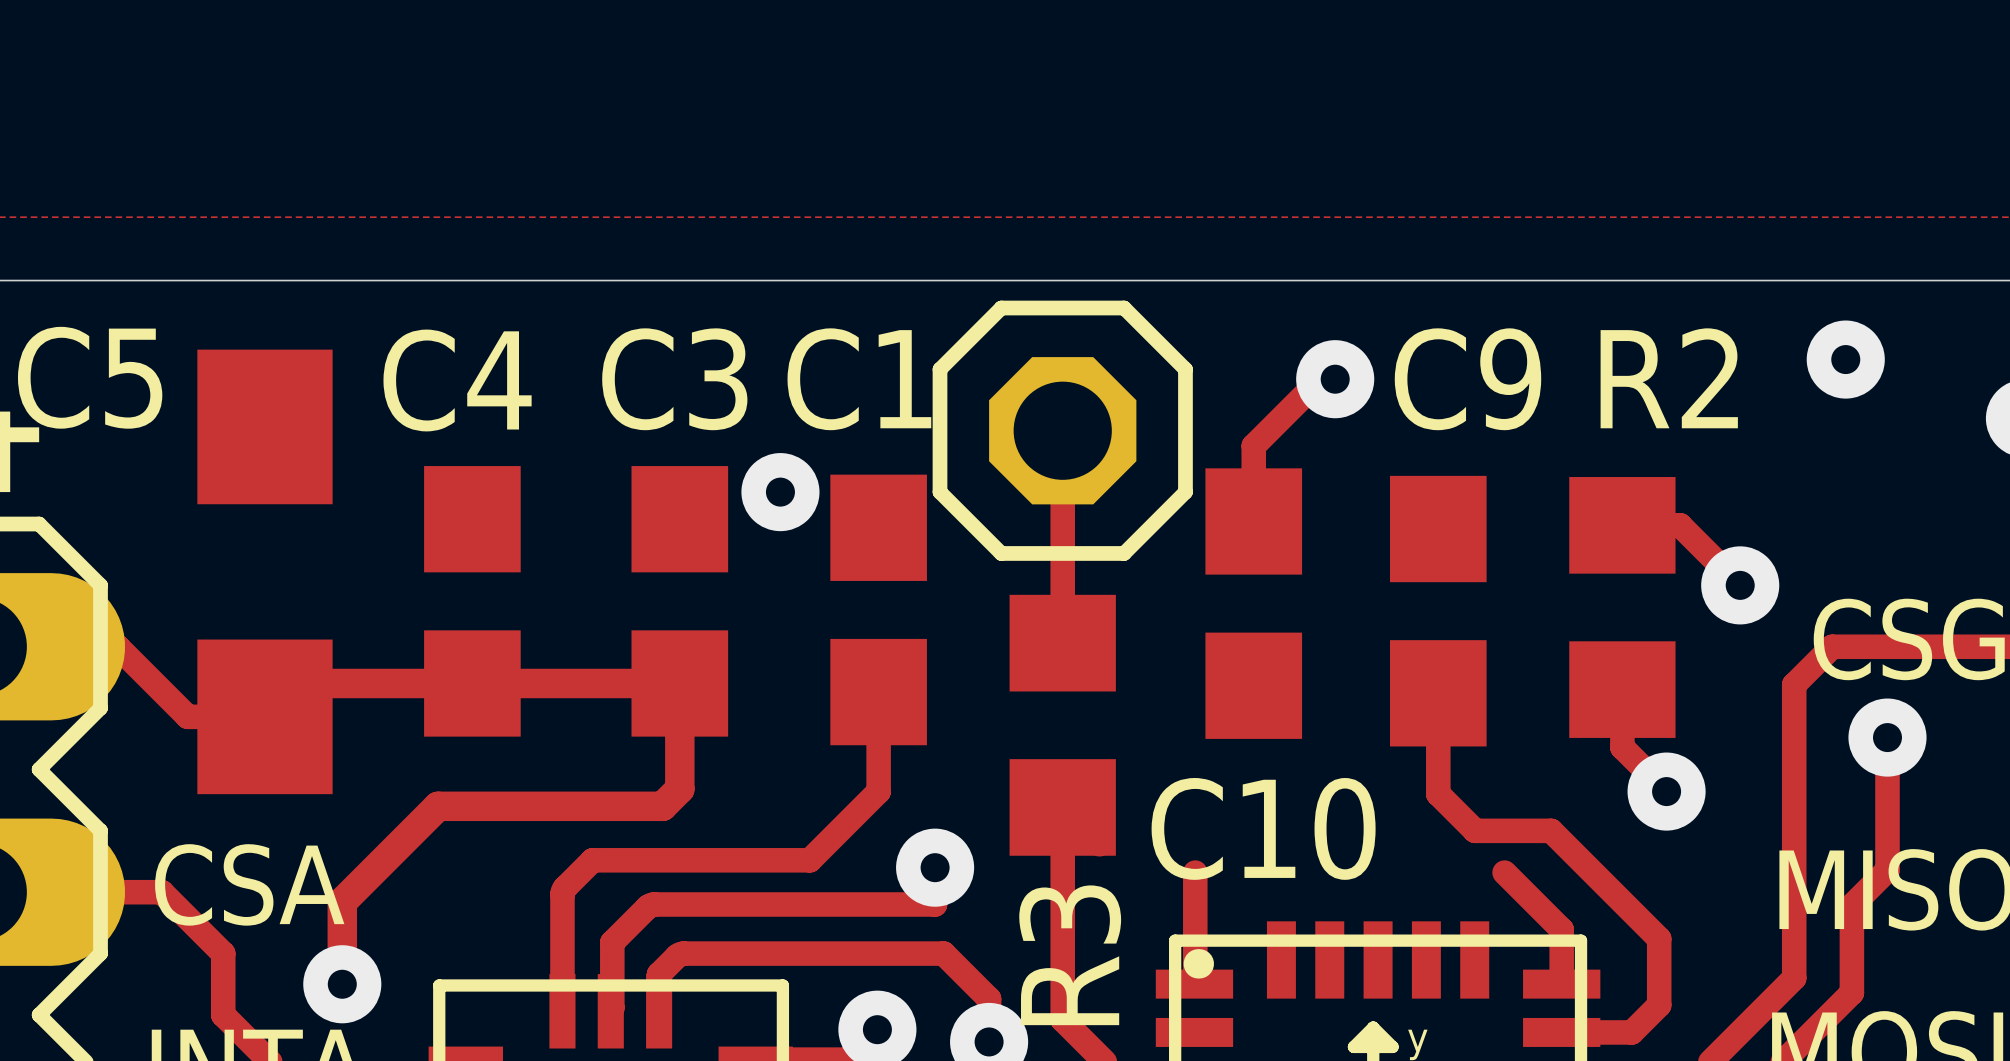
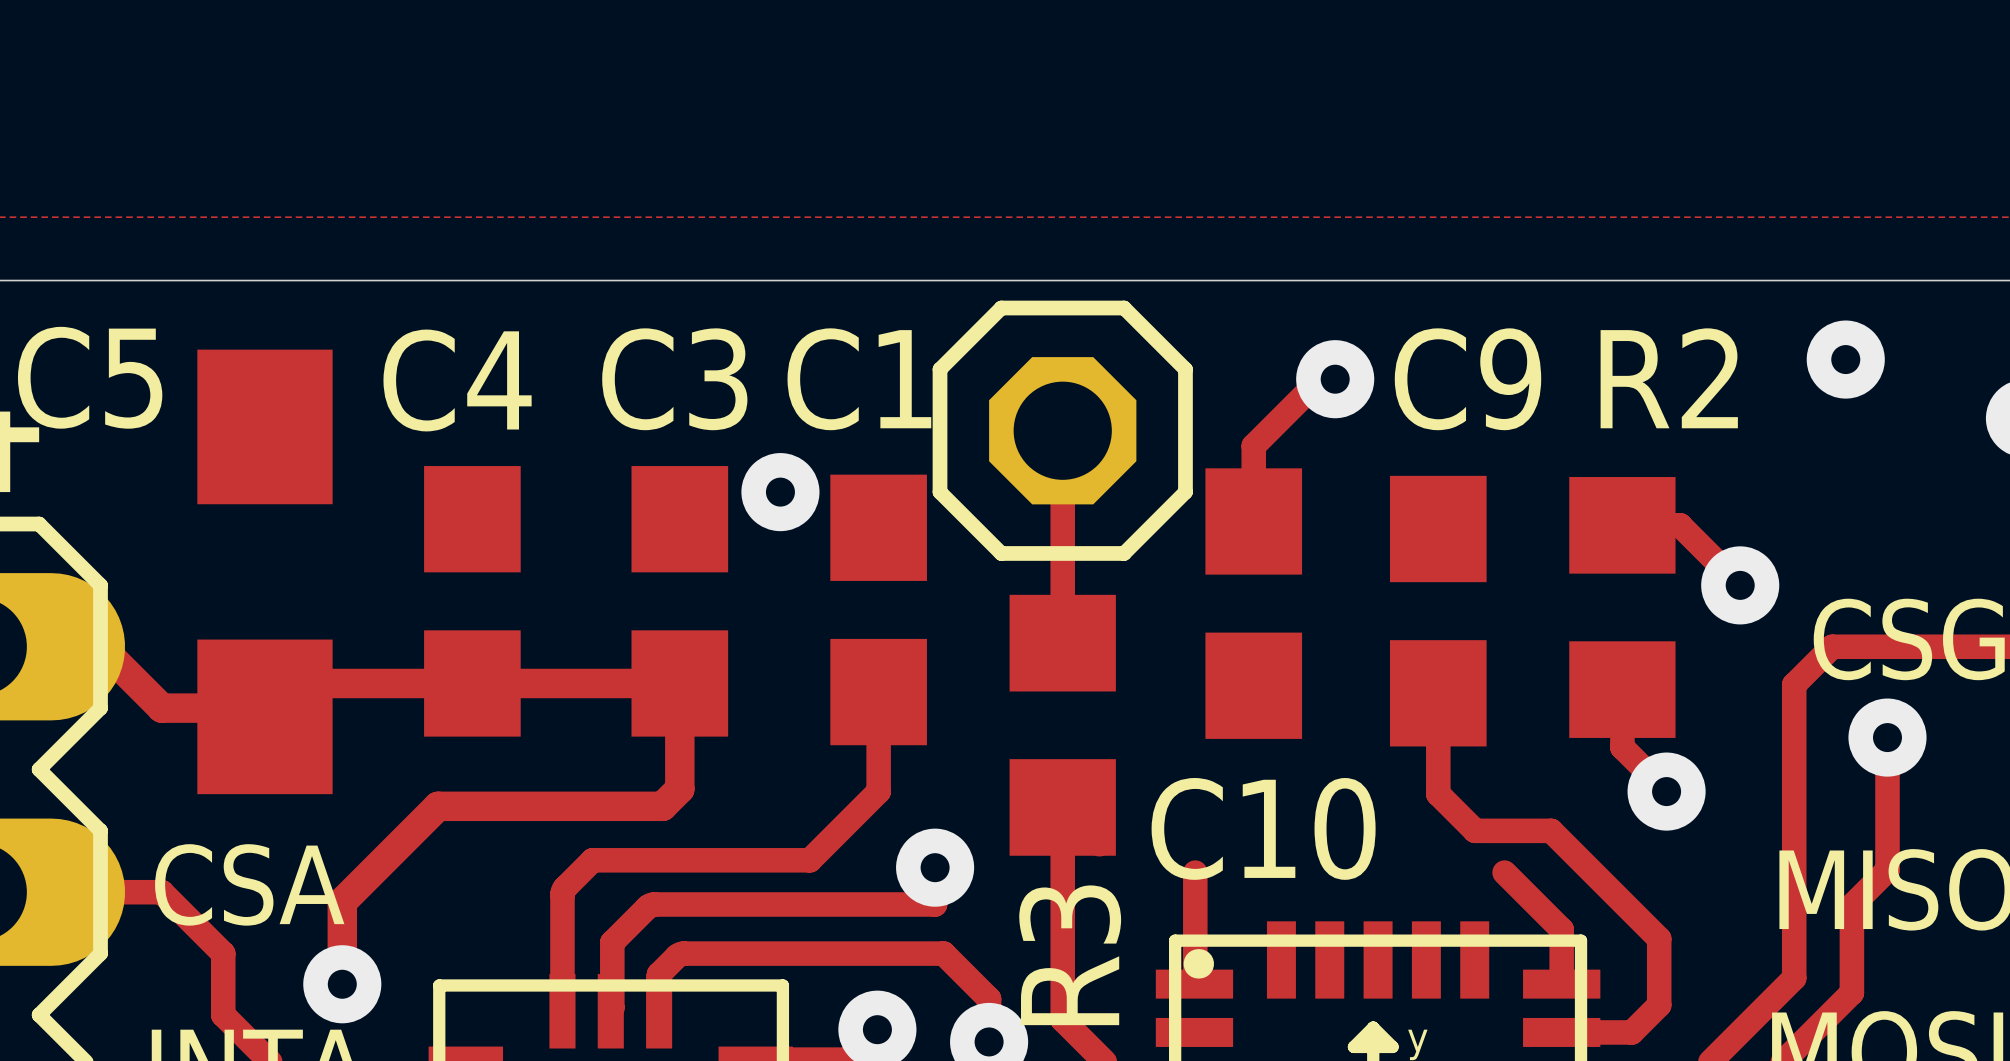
track: (100, 646) (117, 646) (187, 716) (264, 716) -> (100, 646) (161, 708) (256, 708) (264, 716)

